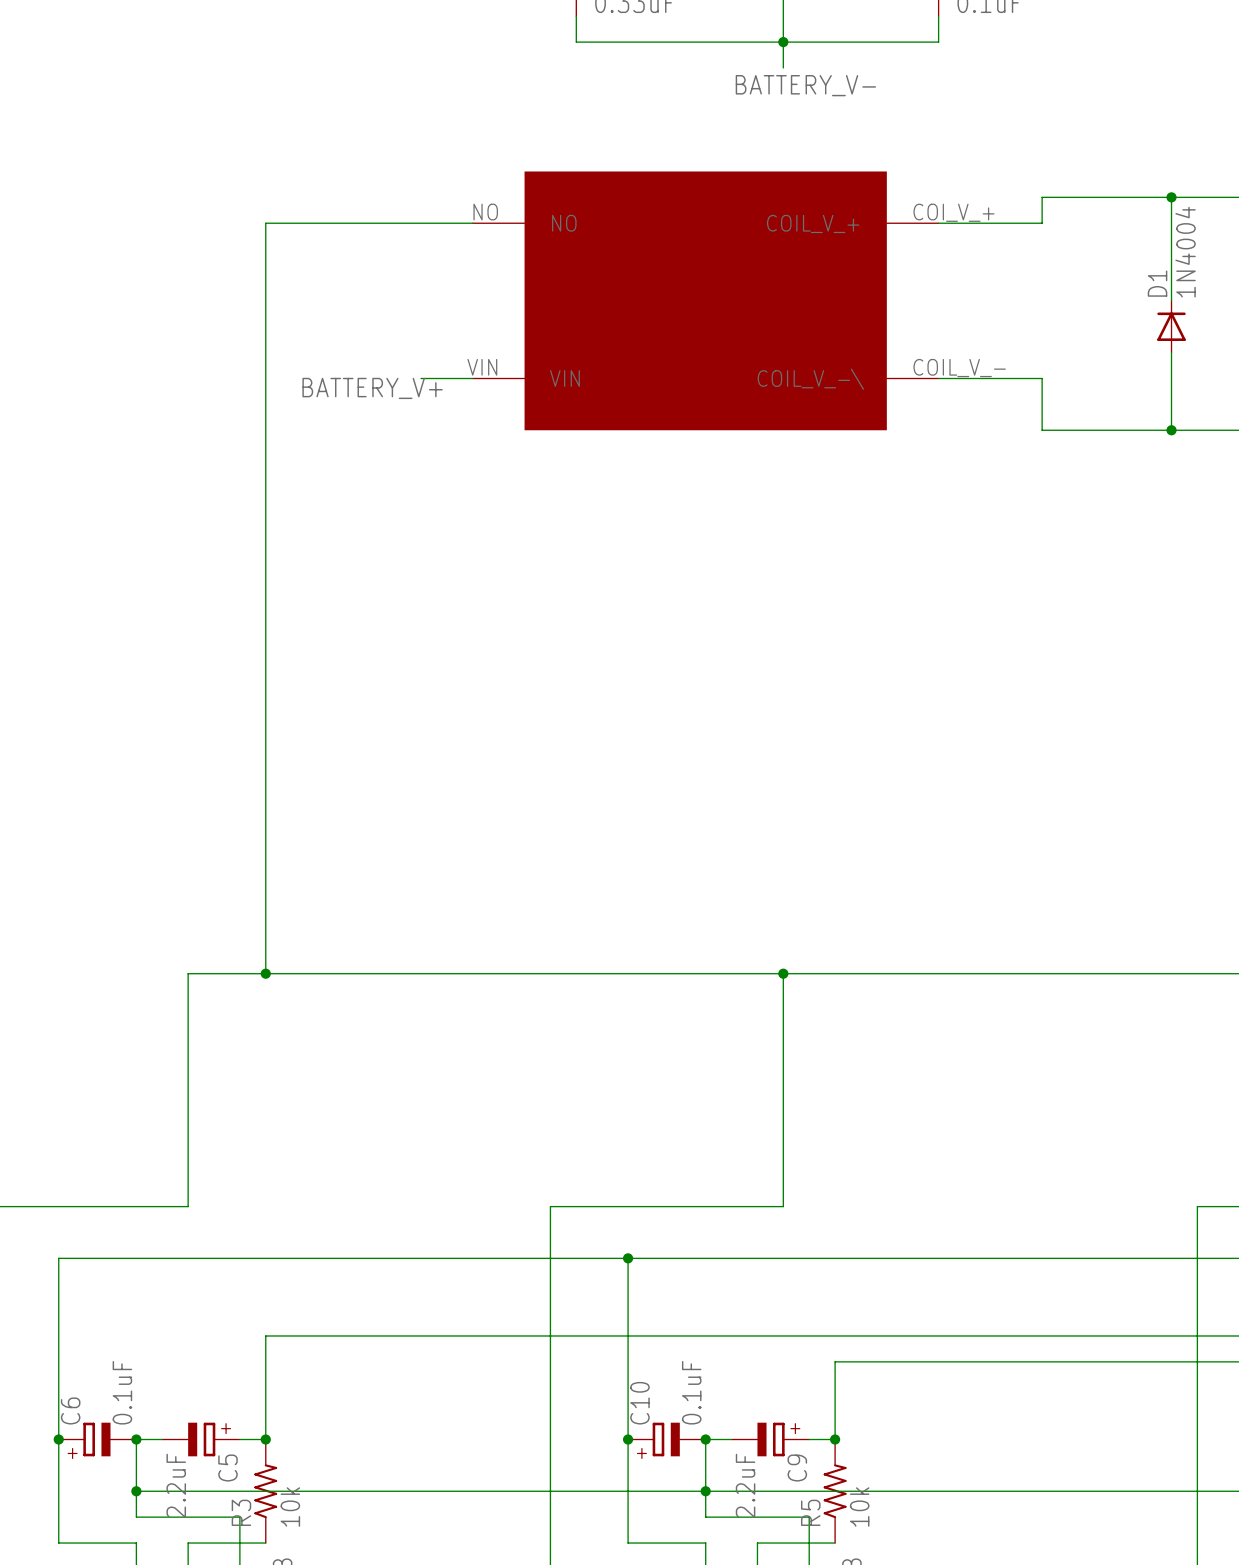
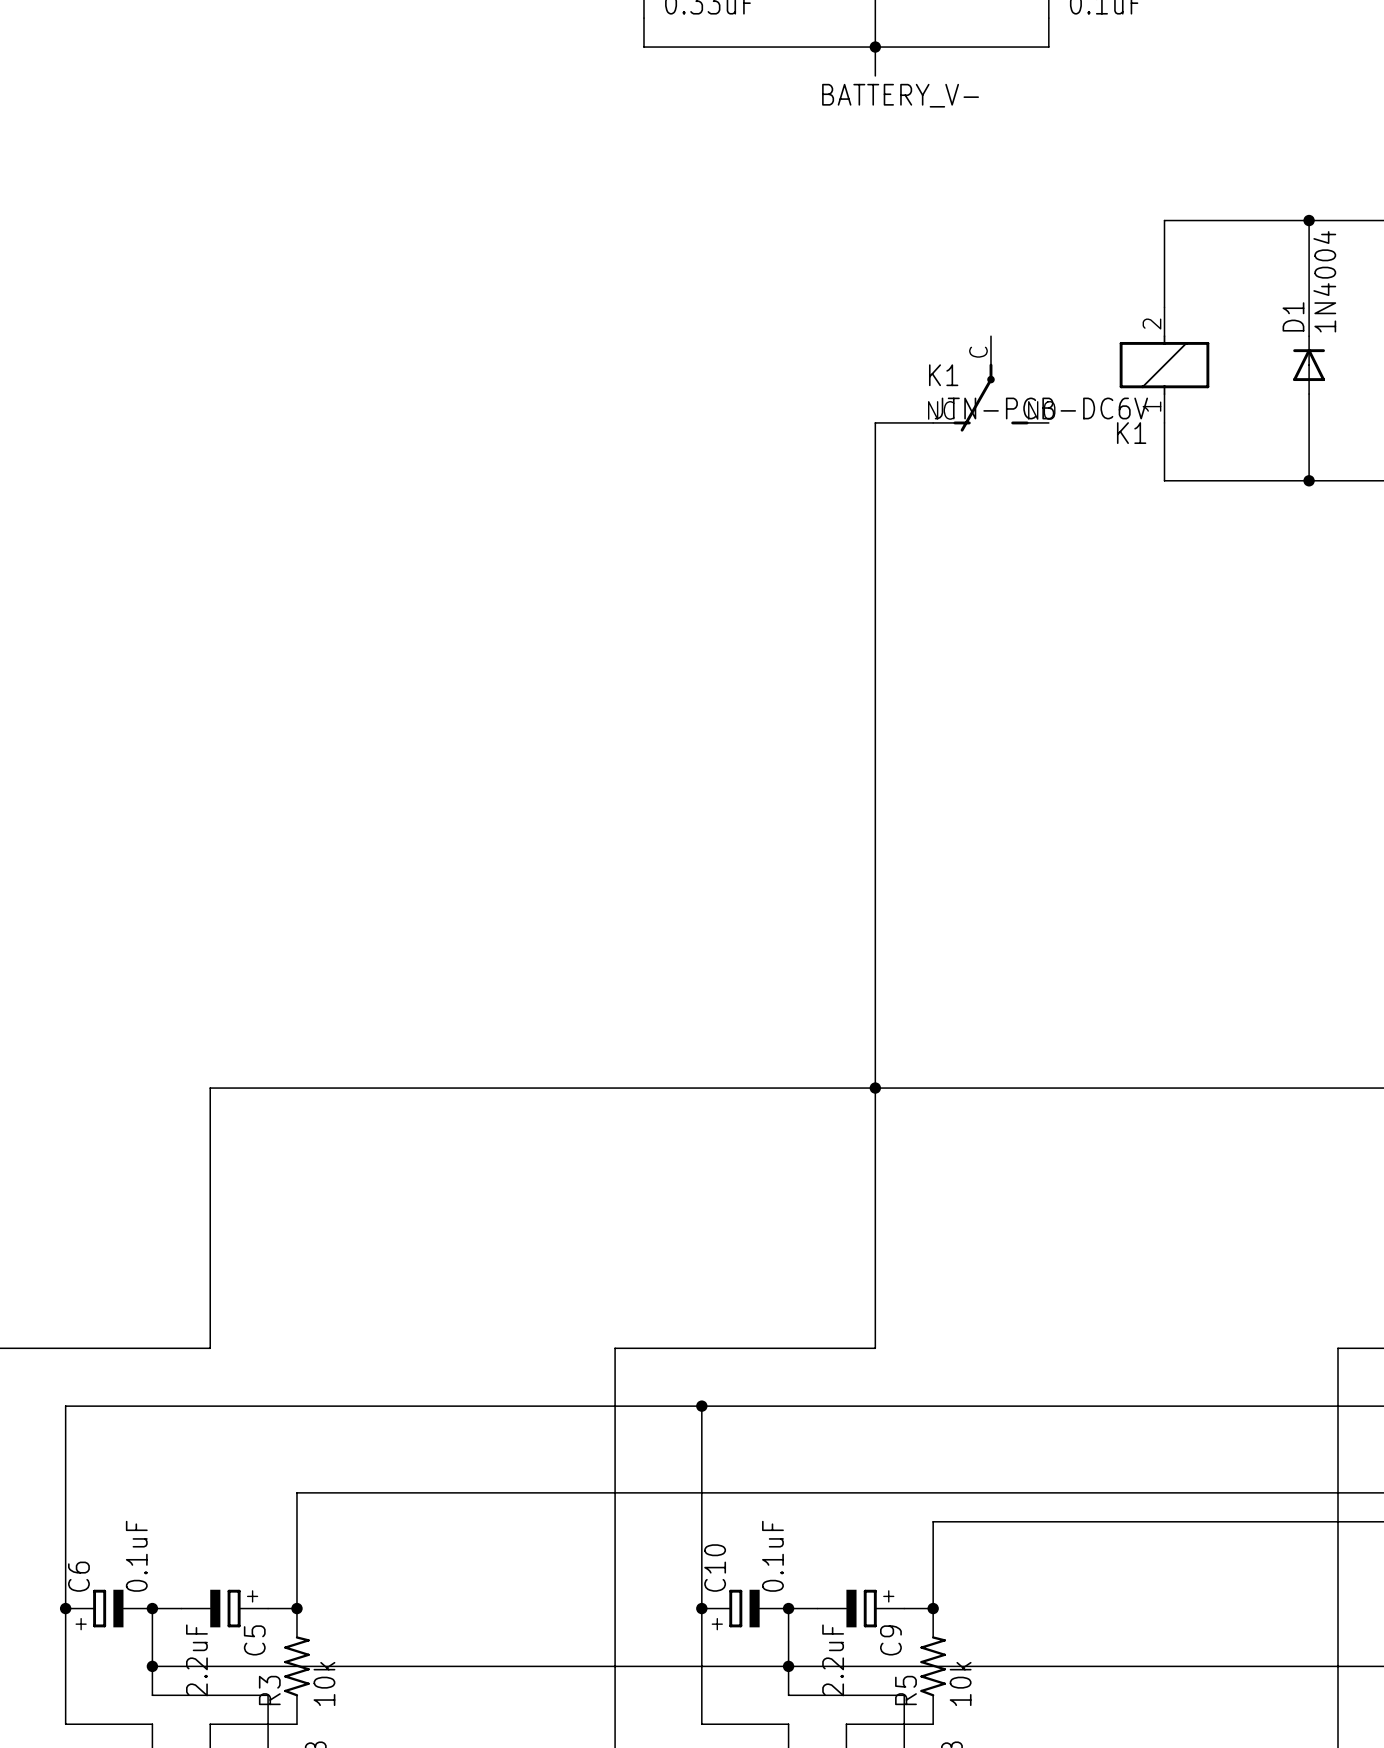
wire: (472, 223) (265, 223) (265, 973) -> none
wire: (938, 223) (1042, 223) -> (1164, 307) (1164, 249)
part: (705, 300) -> none
K1: none -> JTN-PCB-DC6V (1164, 365)
K1: none -> (990, 383)
wire: (421, 378) (472, 378) -> none
wire: none -> (933, 422) (875, 422) (875, 1088)
wire: (938, 378) (1042, 378) -> none
label: BATTERY_V+ (372, 388) -> none
junction: (265, 973) -> none

